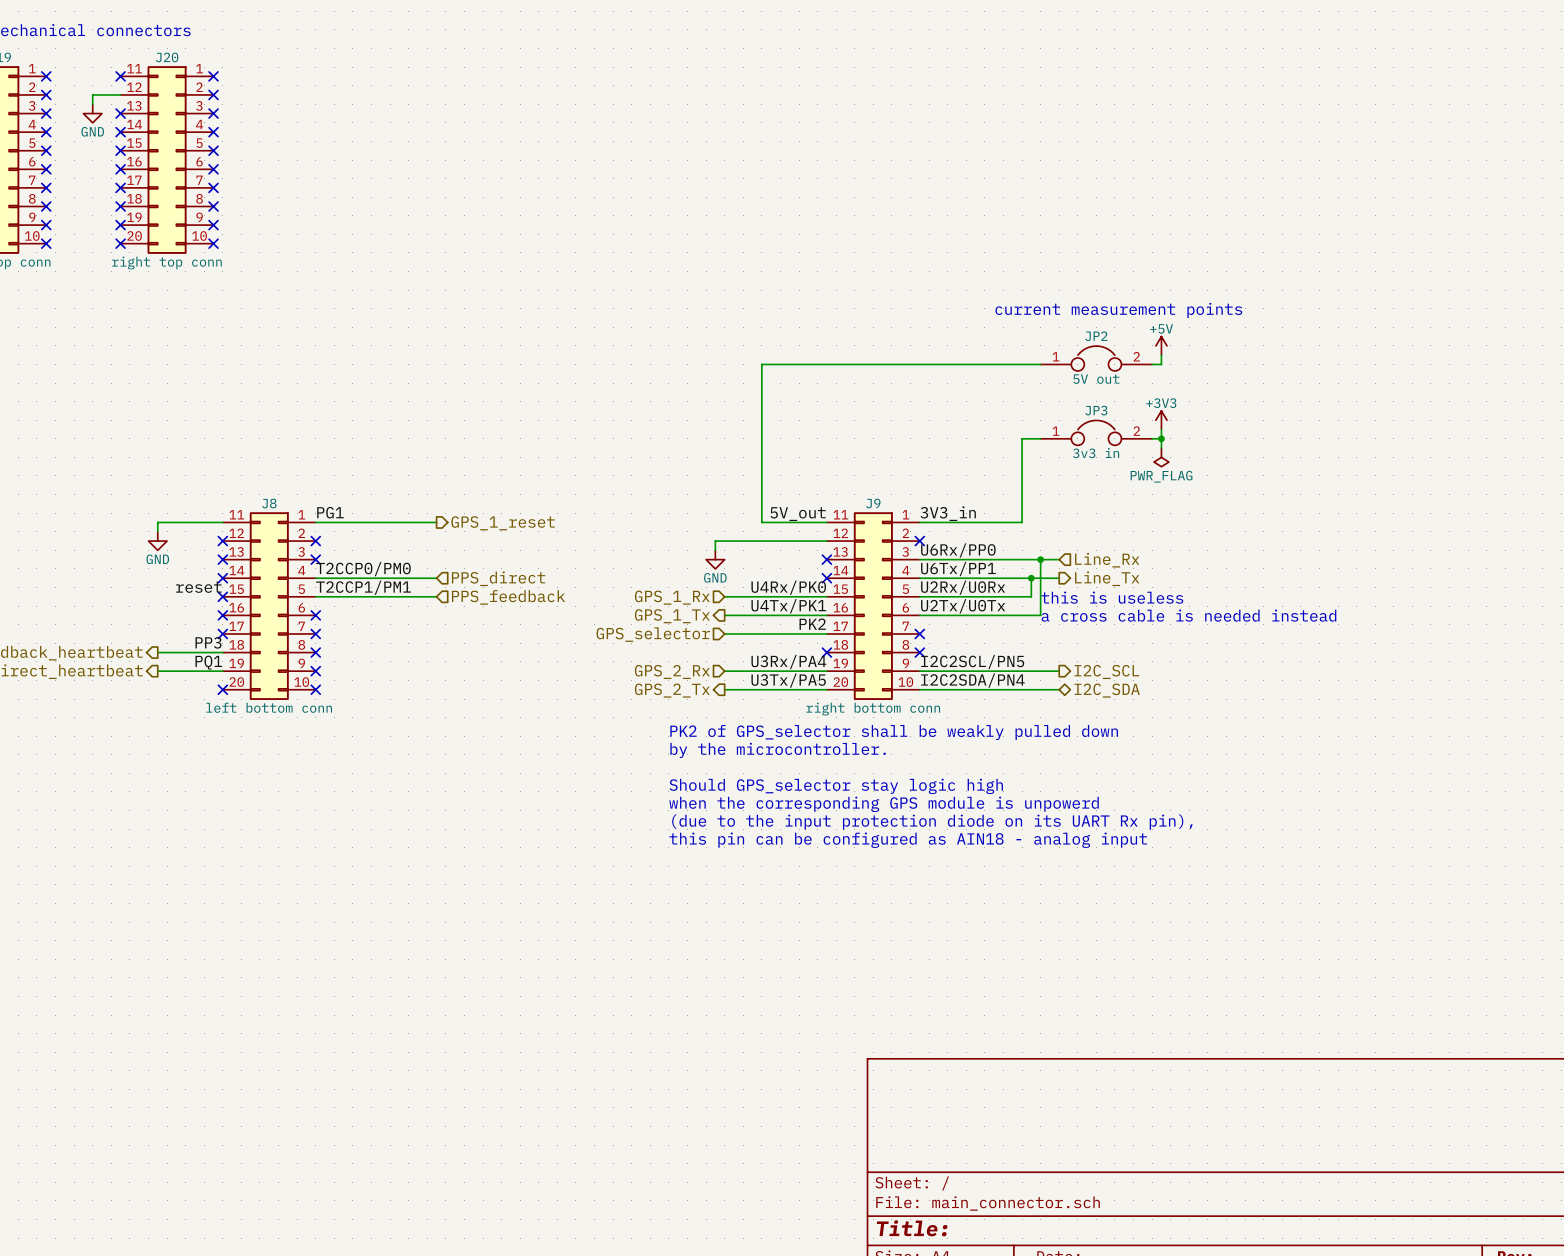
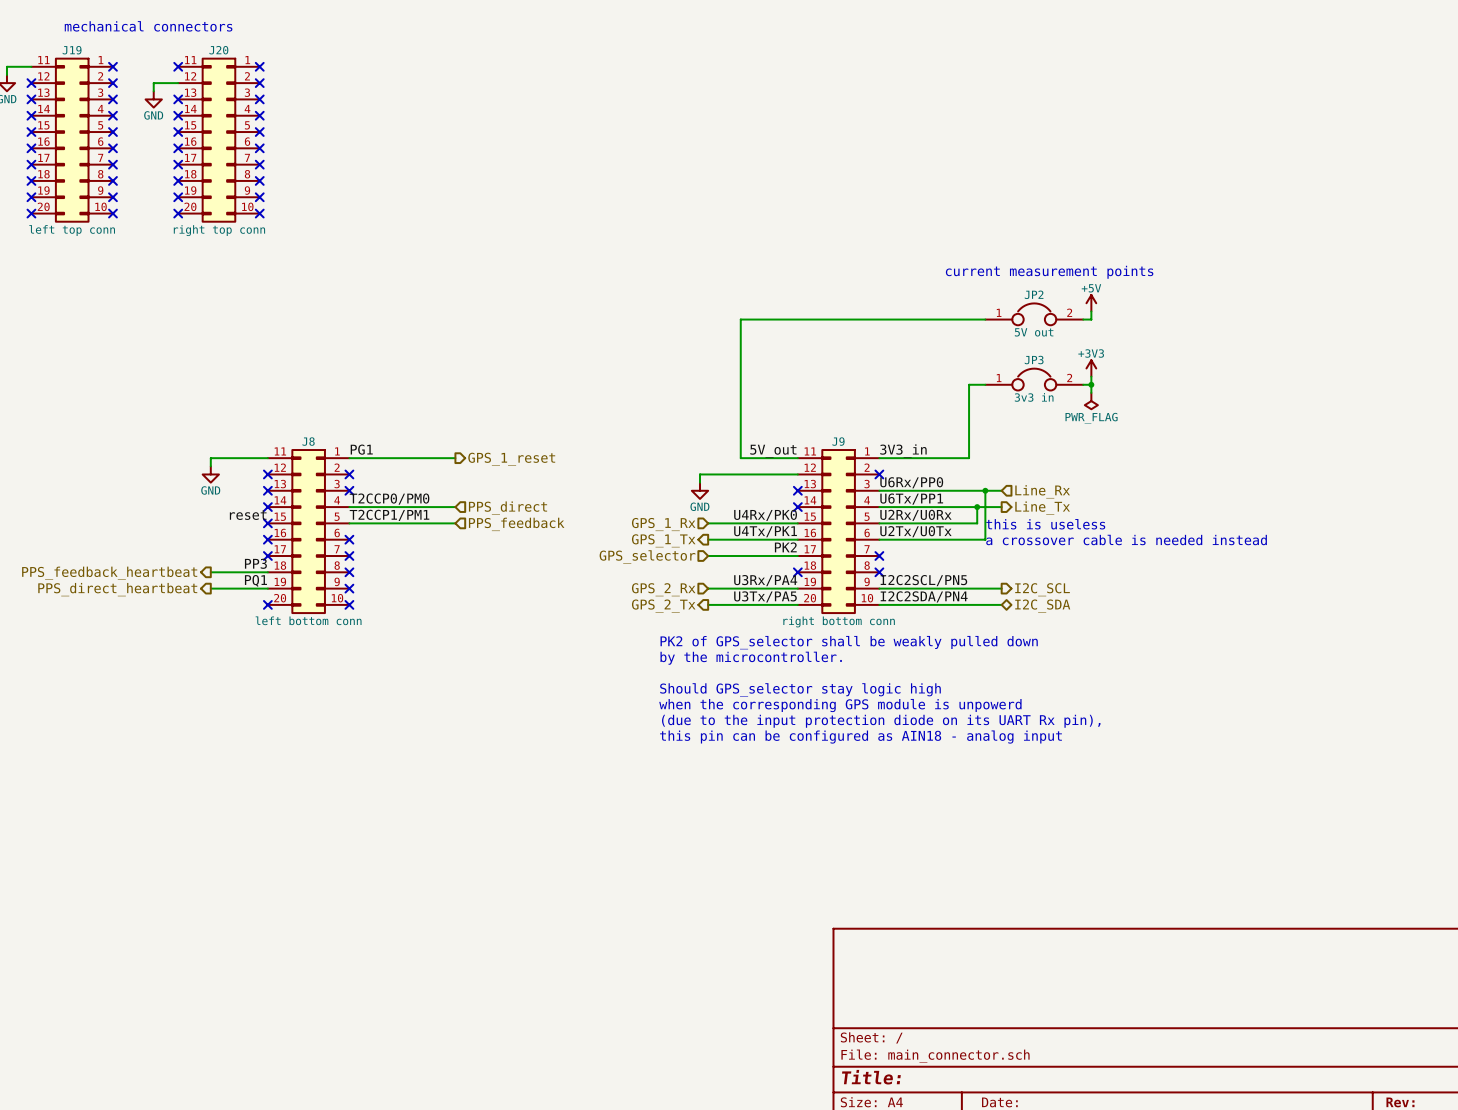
text: a cross cable is needed instead (1188, 615) -> a crossover cable is needed instead (1126, 540)

